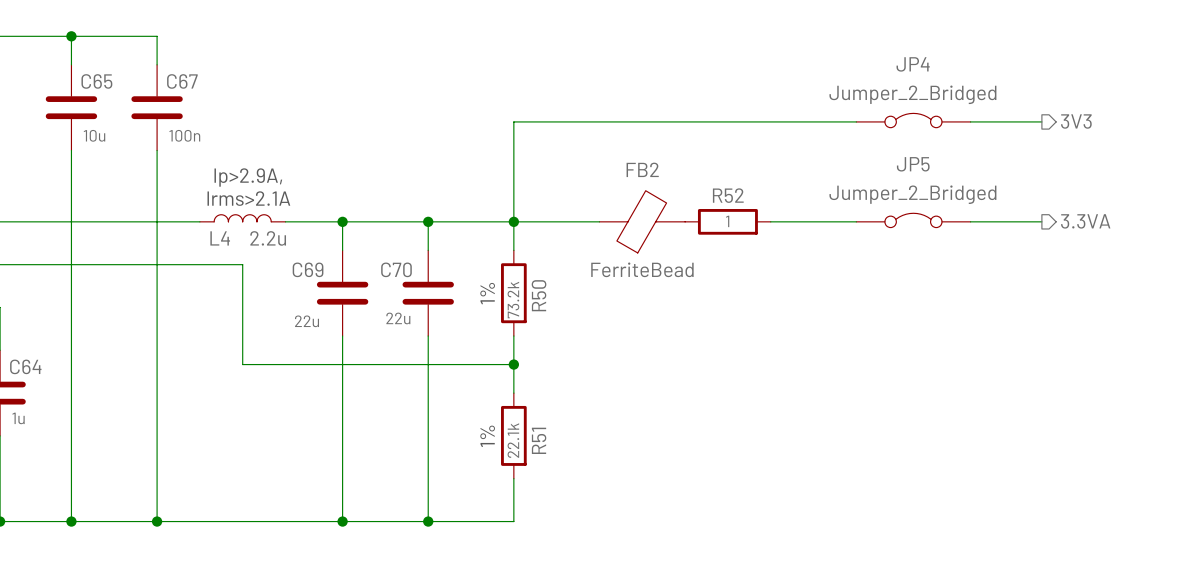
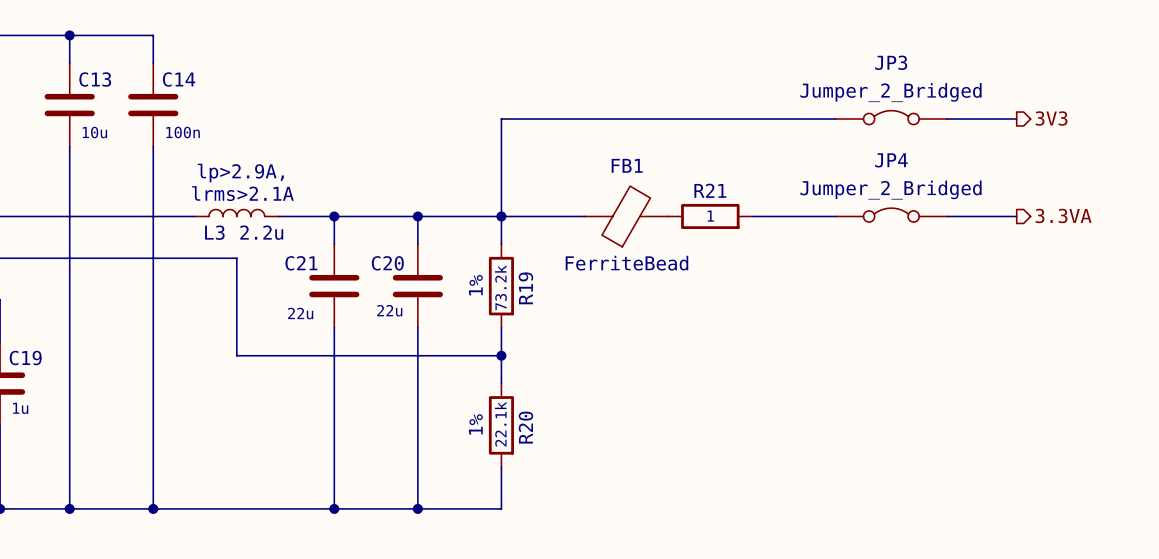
JP4 name: JP4 (913, 64) -> JP3 (891, 62)
C65 name: C65 (96, 81) -> C13 (95, 79)
C67 name: C67 (182, 81) -> C14 (179, 79)
JP5 name: JP5 (913, 164) -> JP4 (891, 160)
FB2 name: FB2 (642, 169) -> FB1 (627, 165)
R52 name: R52 (728, 195) -> R21 (710, 190)
L4 name: L4 (220, 238) -> L3 (214, 232)
C69 name: C69 (308, 269) -> C21 (301, 263)
C70 name: C70 (396, 269) -> C20 (387, 263)
R50 name: R50 (539, 295) -> R19 (525, 288)
C64 name: C64 (25, 366) -> C19 (25, 358)
R51 name: R51 (539, 440) -> R20 (525, 427)

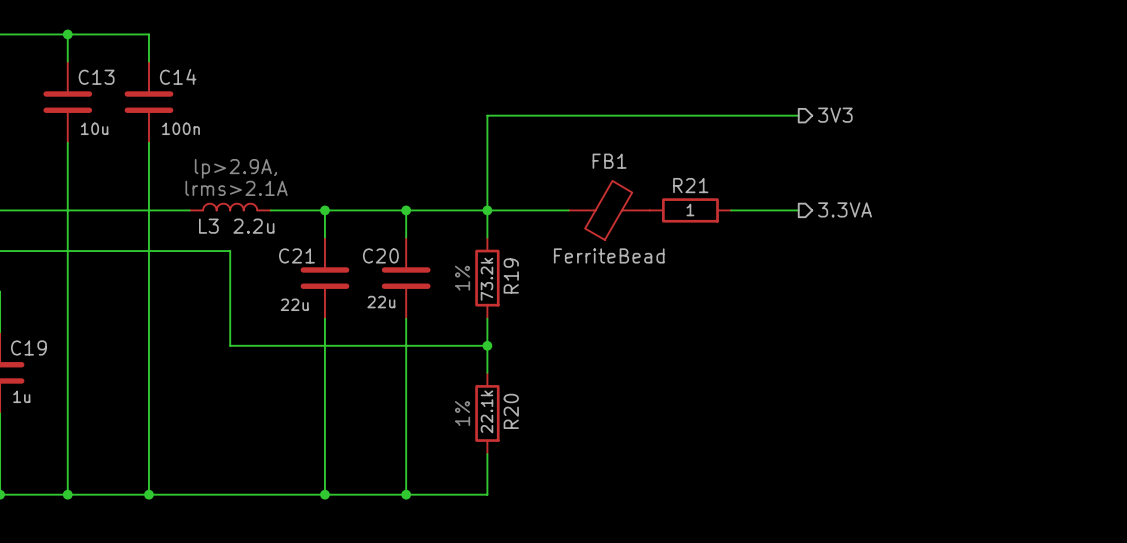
JP3: Jumper_2_Bridged (891, 117) -> none
hierarchical label position: 3V3 (1051, 118) -> 3V3 (835, 115)
wire: (821, 119) (835, 119) -> none
wire: (947, 119) (1016, 119) -> none
JP4: Jumper_2_Bridged (891, 215) -> none
hierarchical label position: 3.3VA (1063, 215) -> 3.3VA (845, 209)
wire: (821, 216) (835, 216) -> none
wire: (947, 216) (1016, 216) -> none

